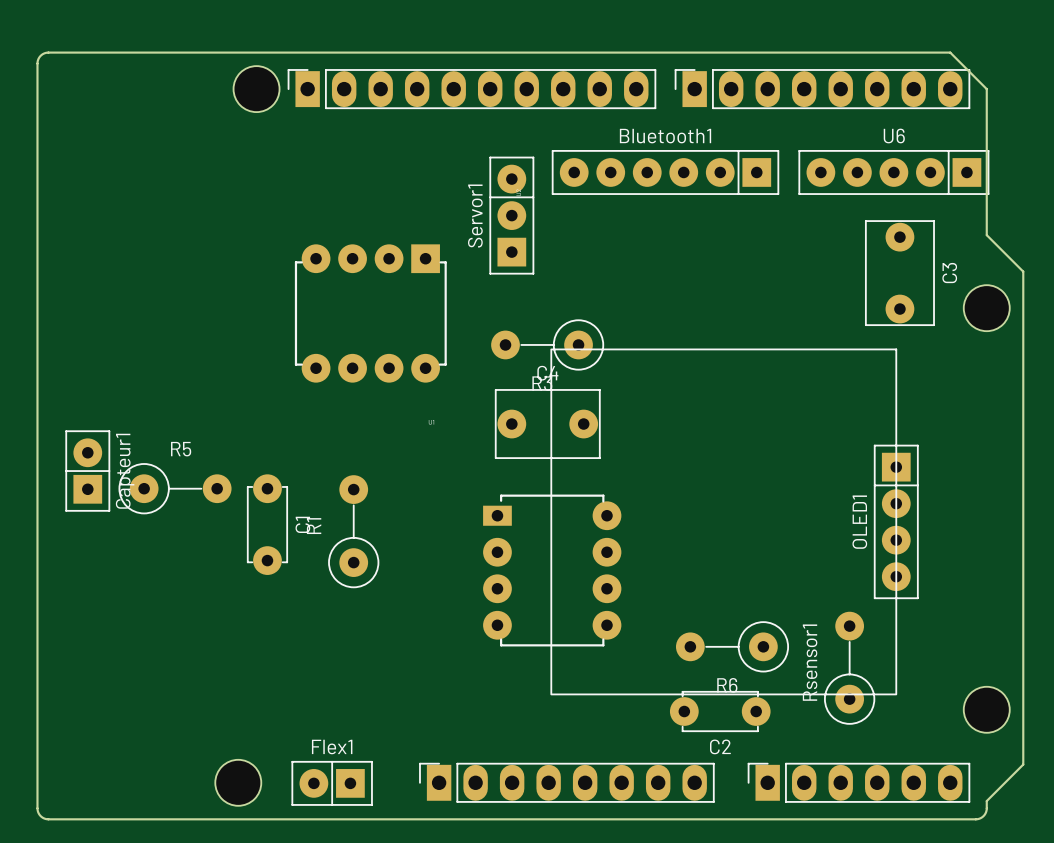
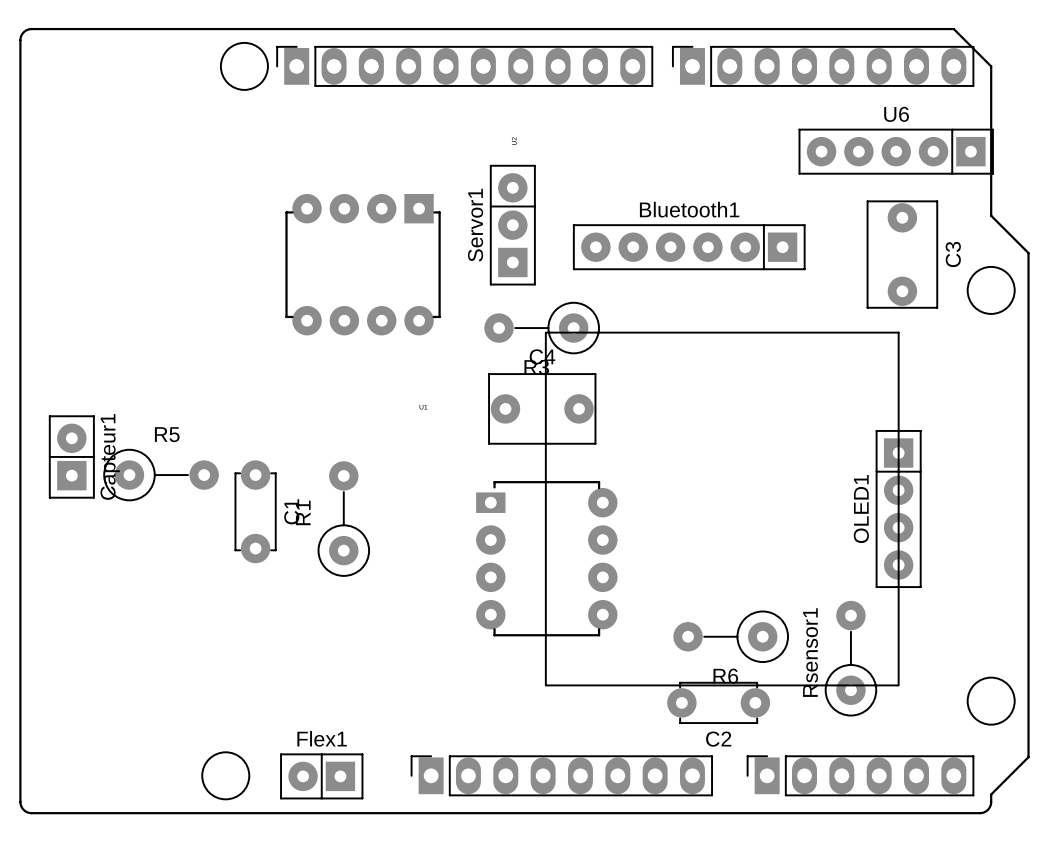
Bluetooth1 position: (665, 172) -> (689, 247)
Servor1 position: (511, 215) -> (512, 225)
part position: (370, 313) -> (363, 264)

